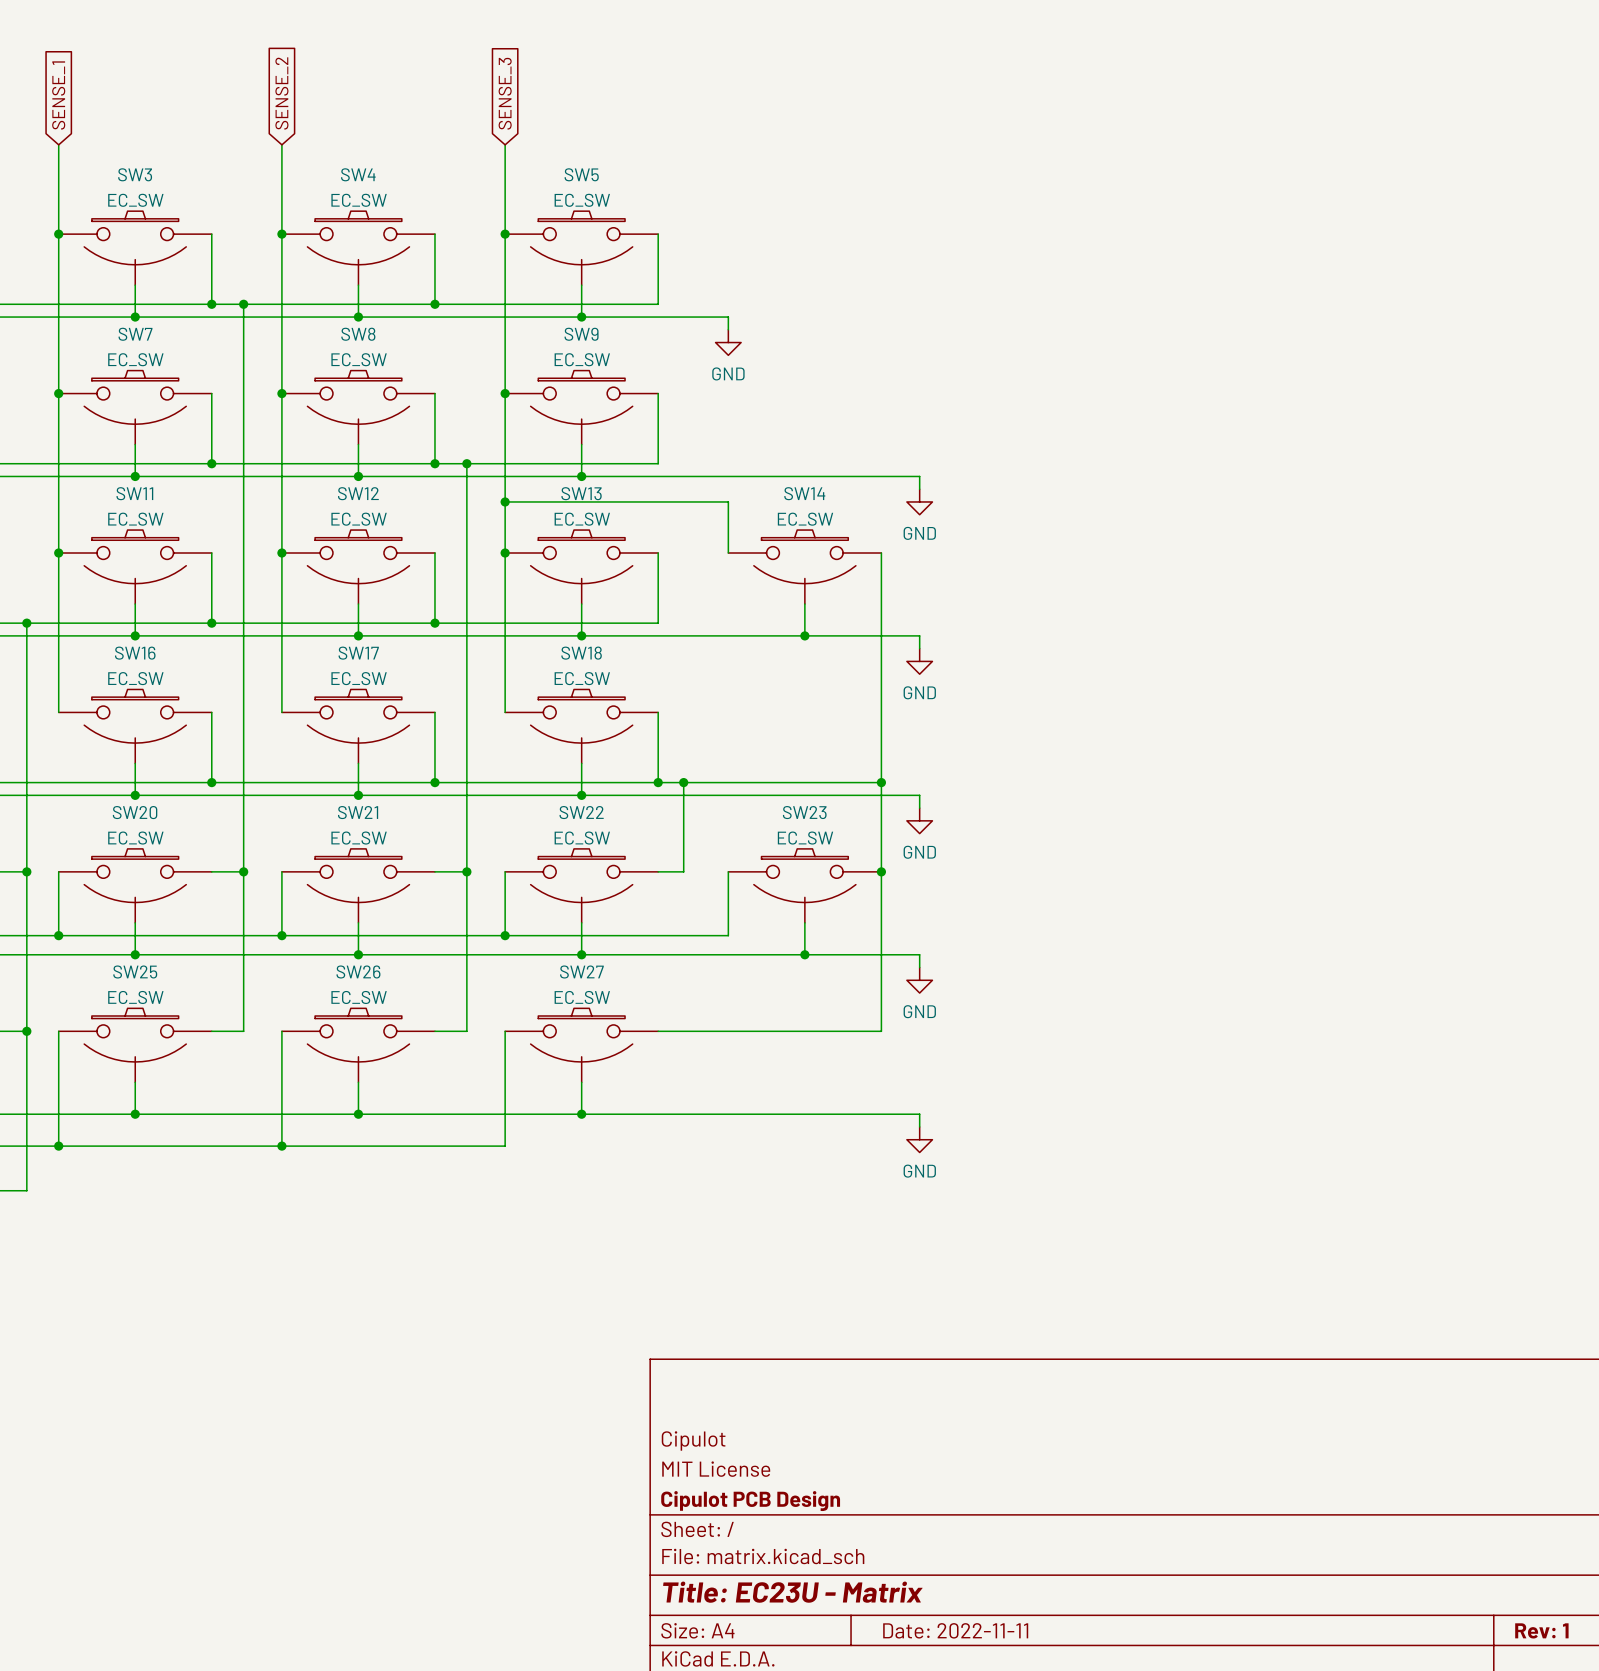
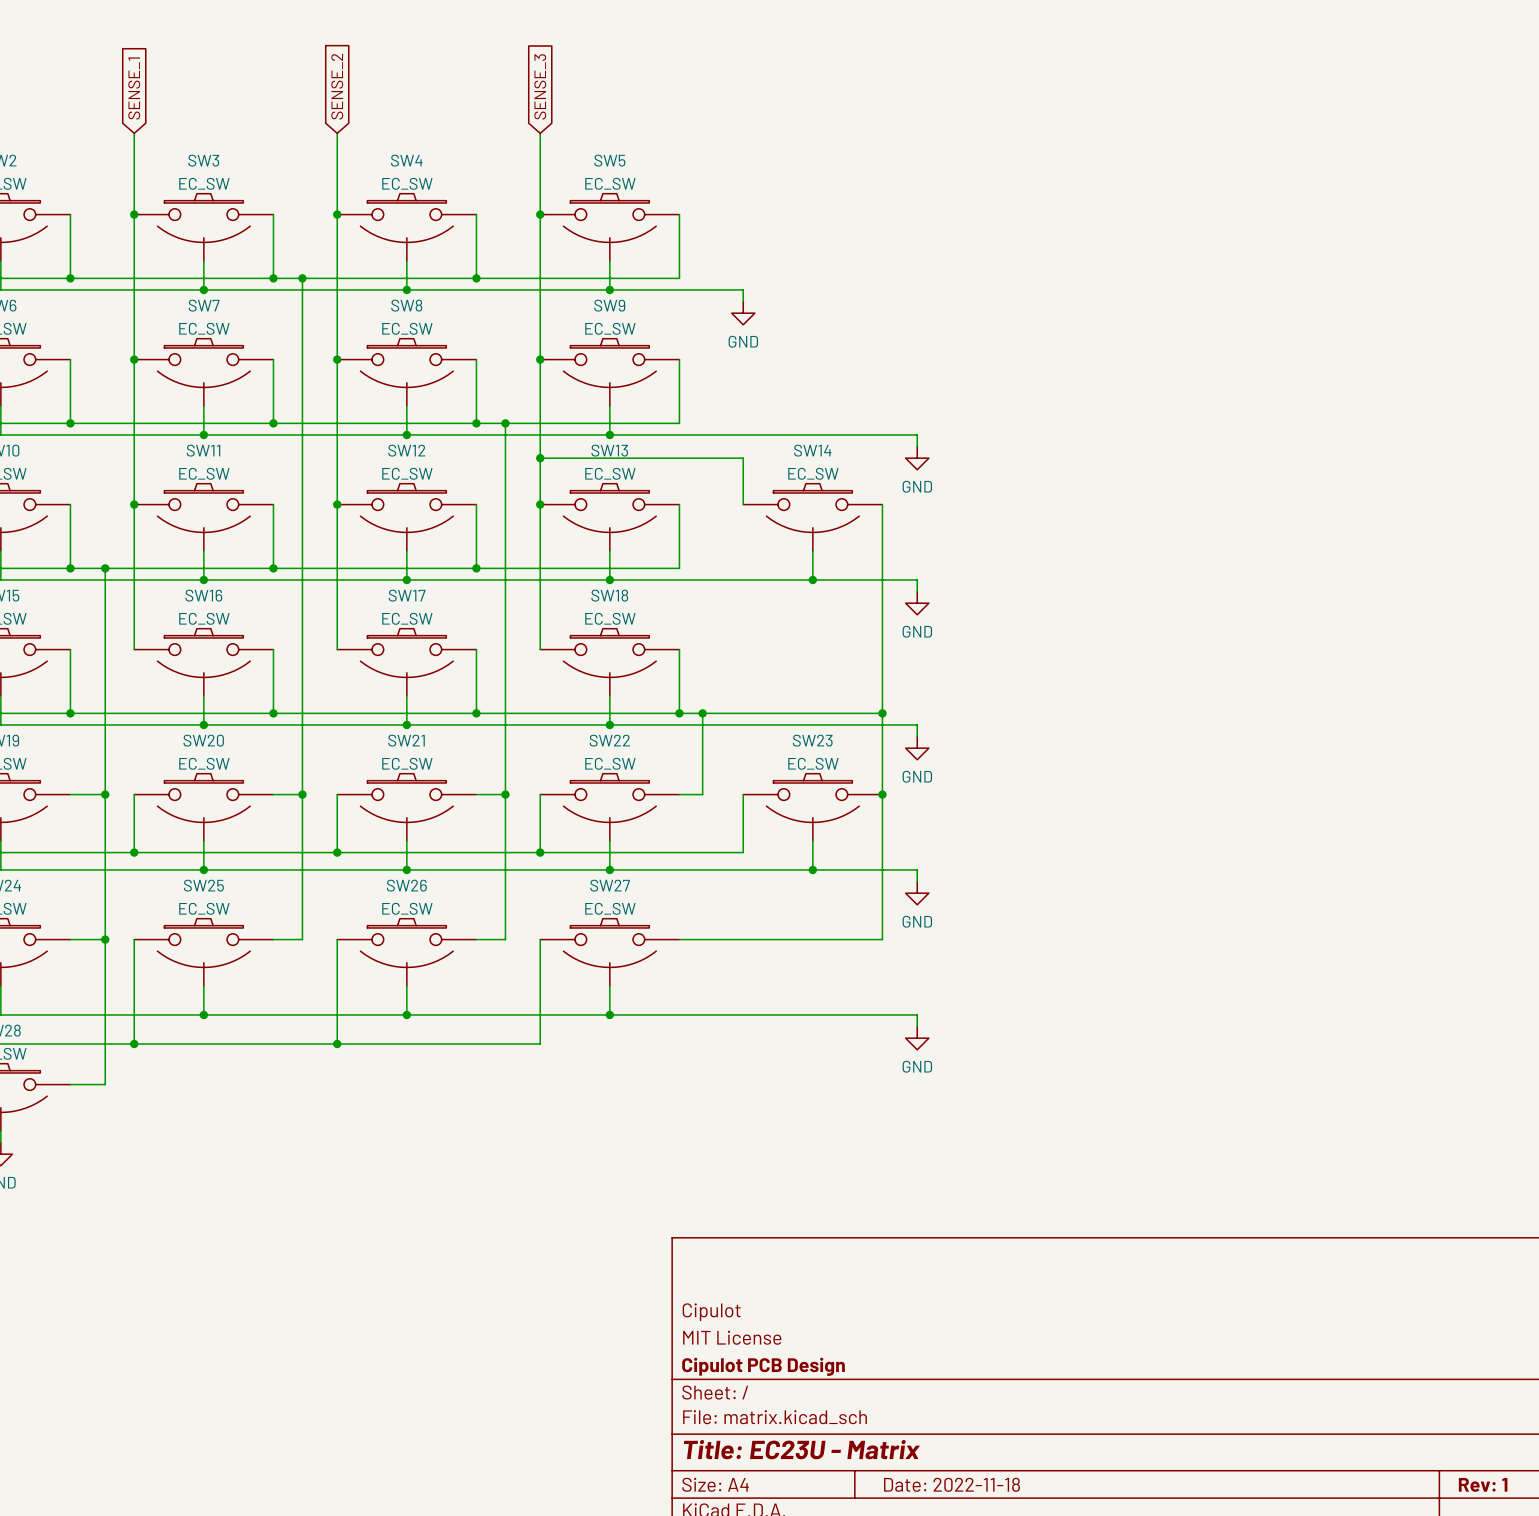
title block: Date: 2022-11-11 (955, 1630) -> Date: 2022-11-18 (951, 1484)

